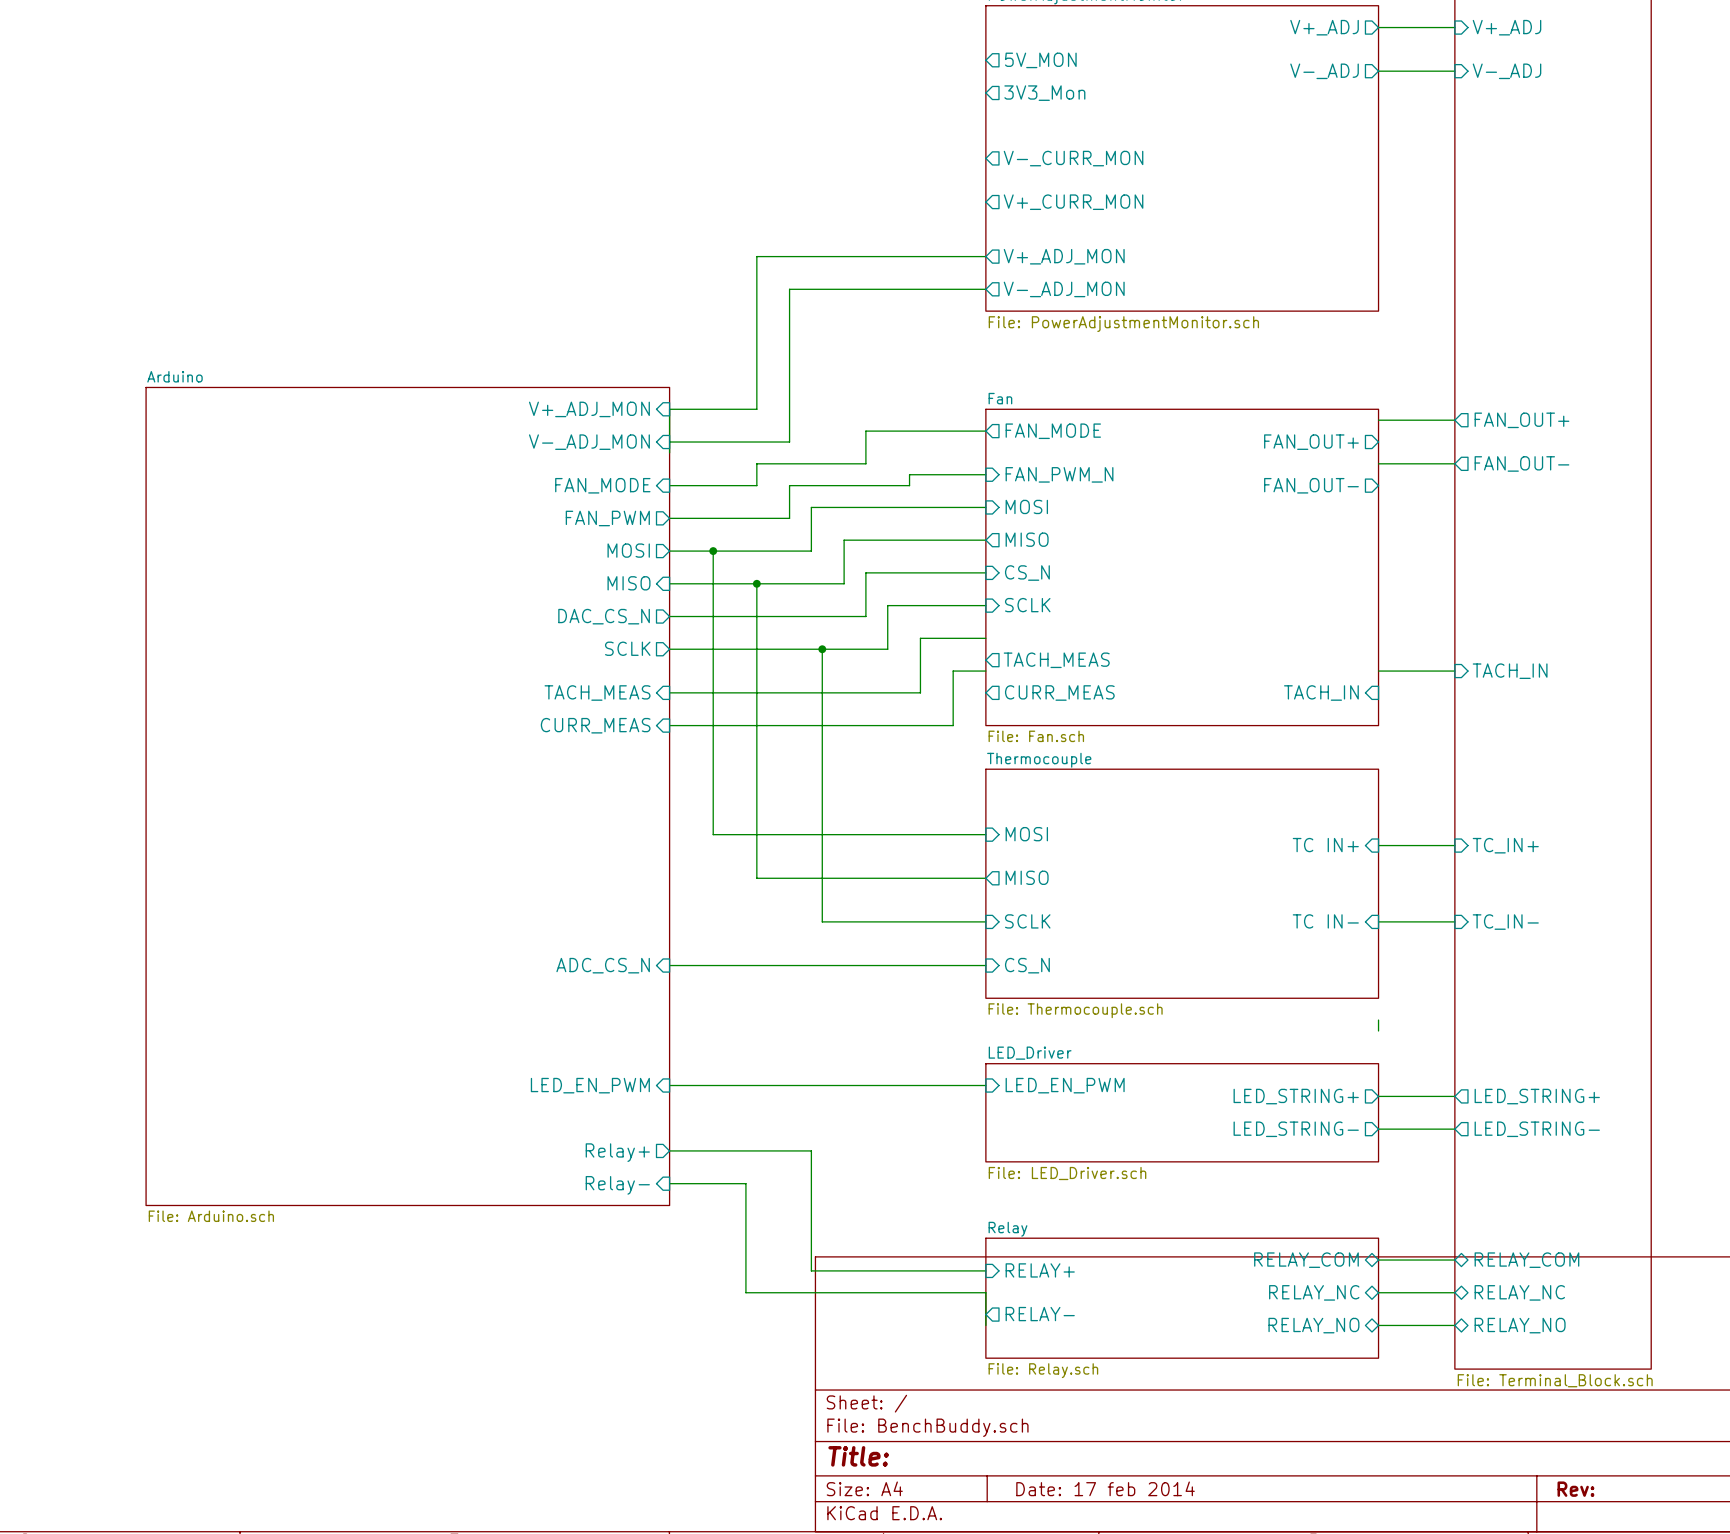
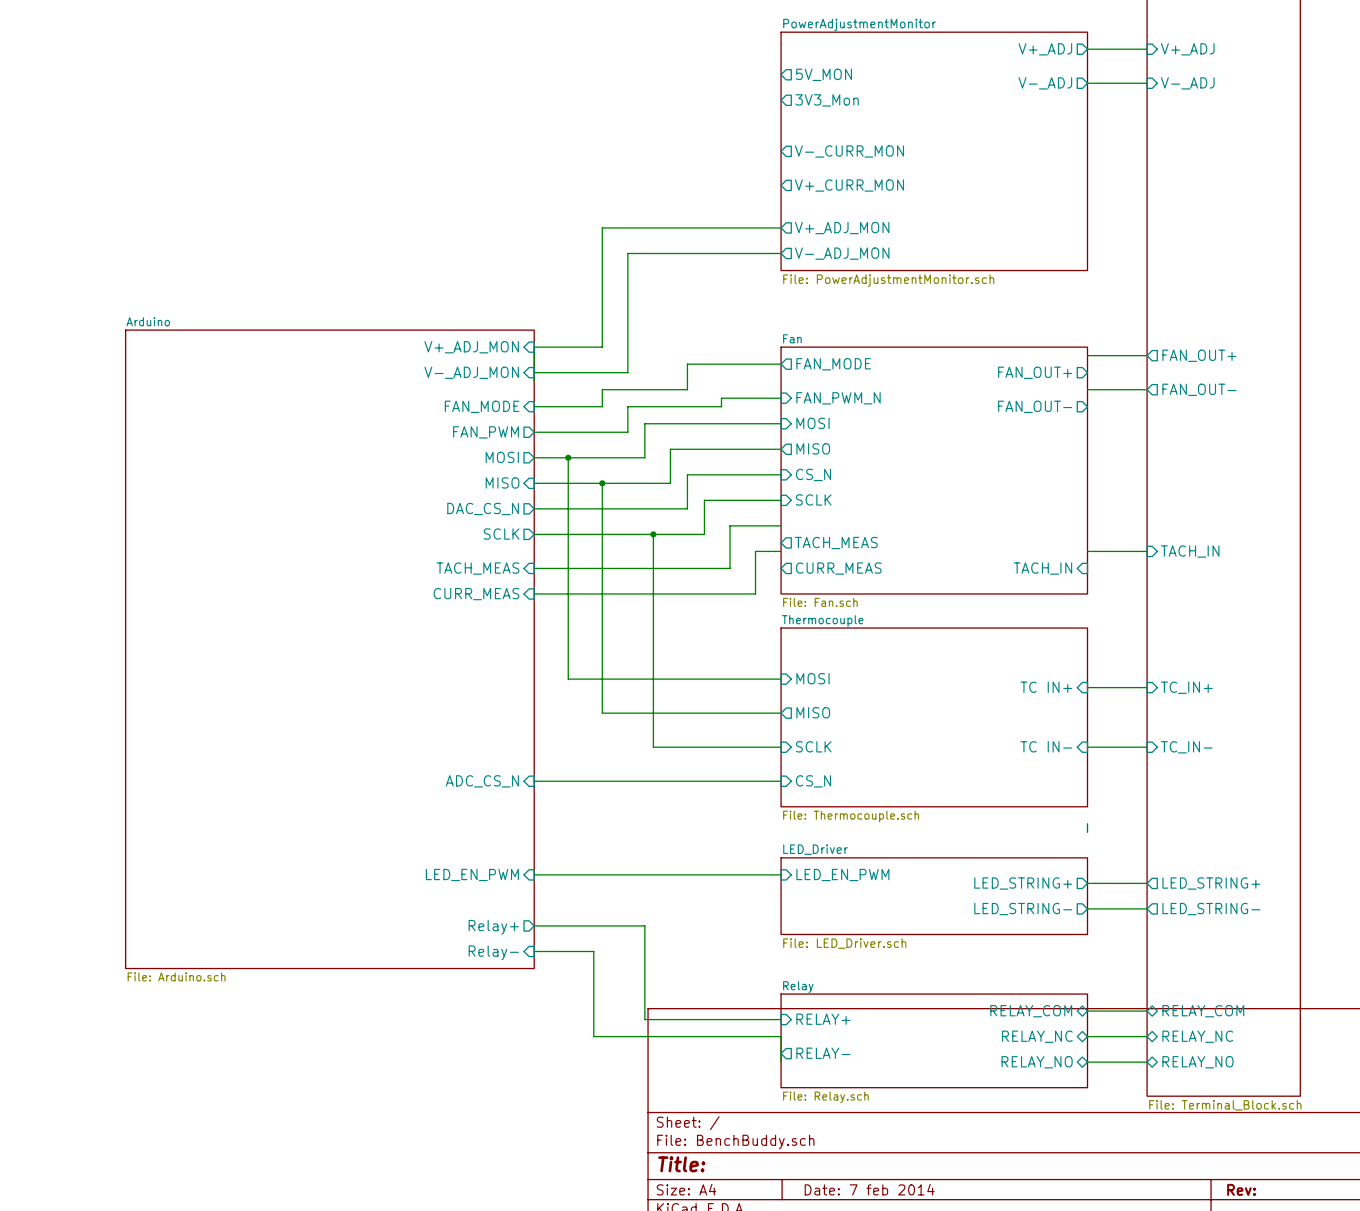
title block: Date: 17 feb 2014 (1105, 1488) -> Date: 7 feb 2014 (869, 1189)

